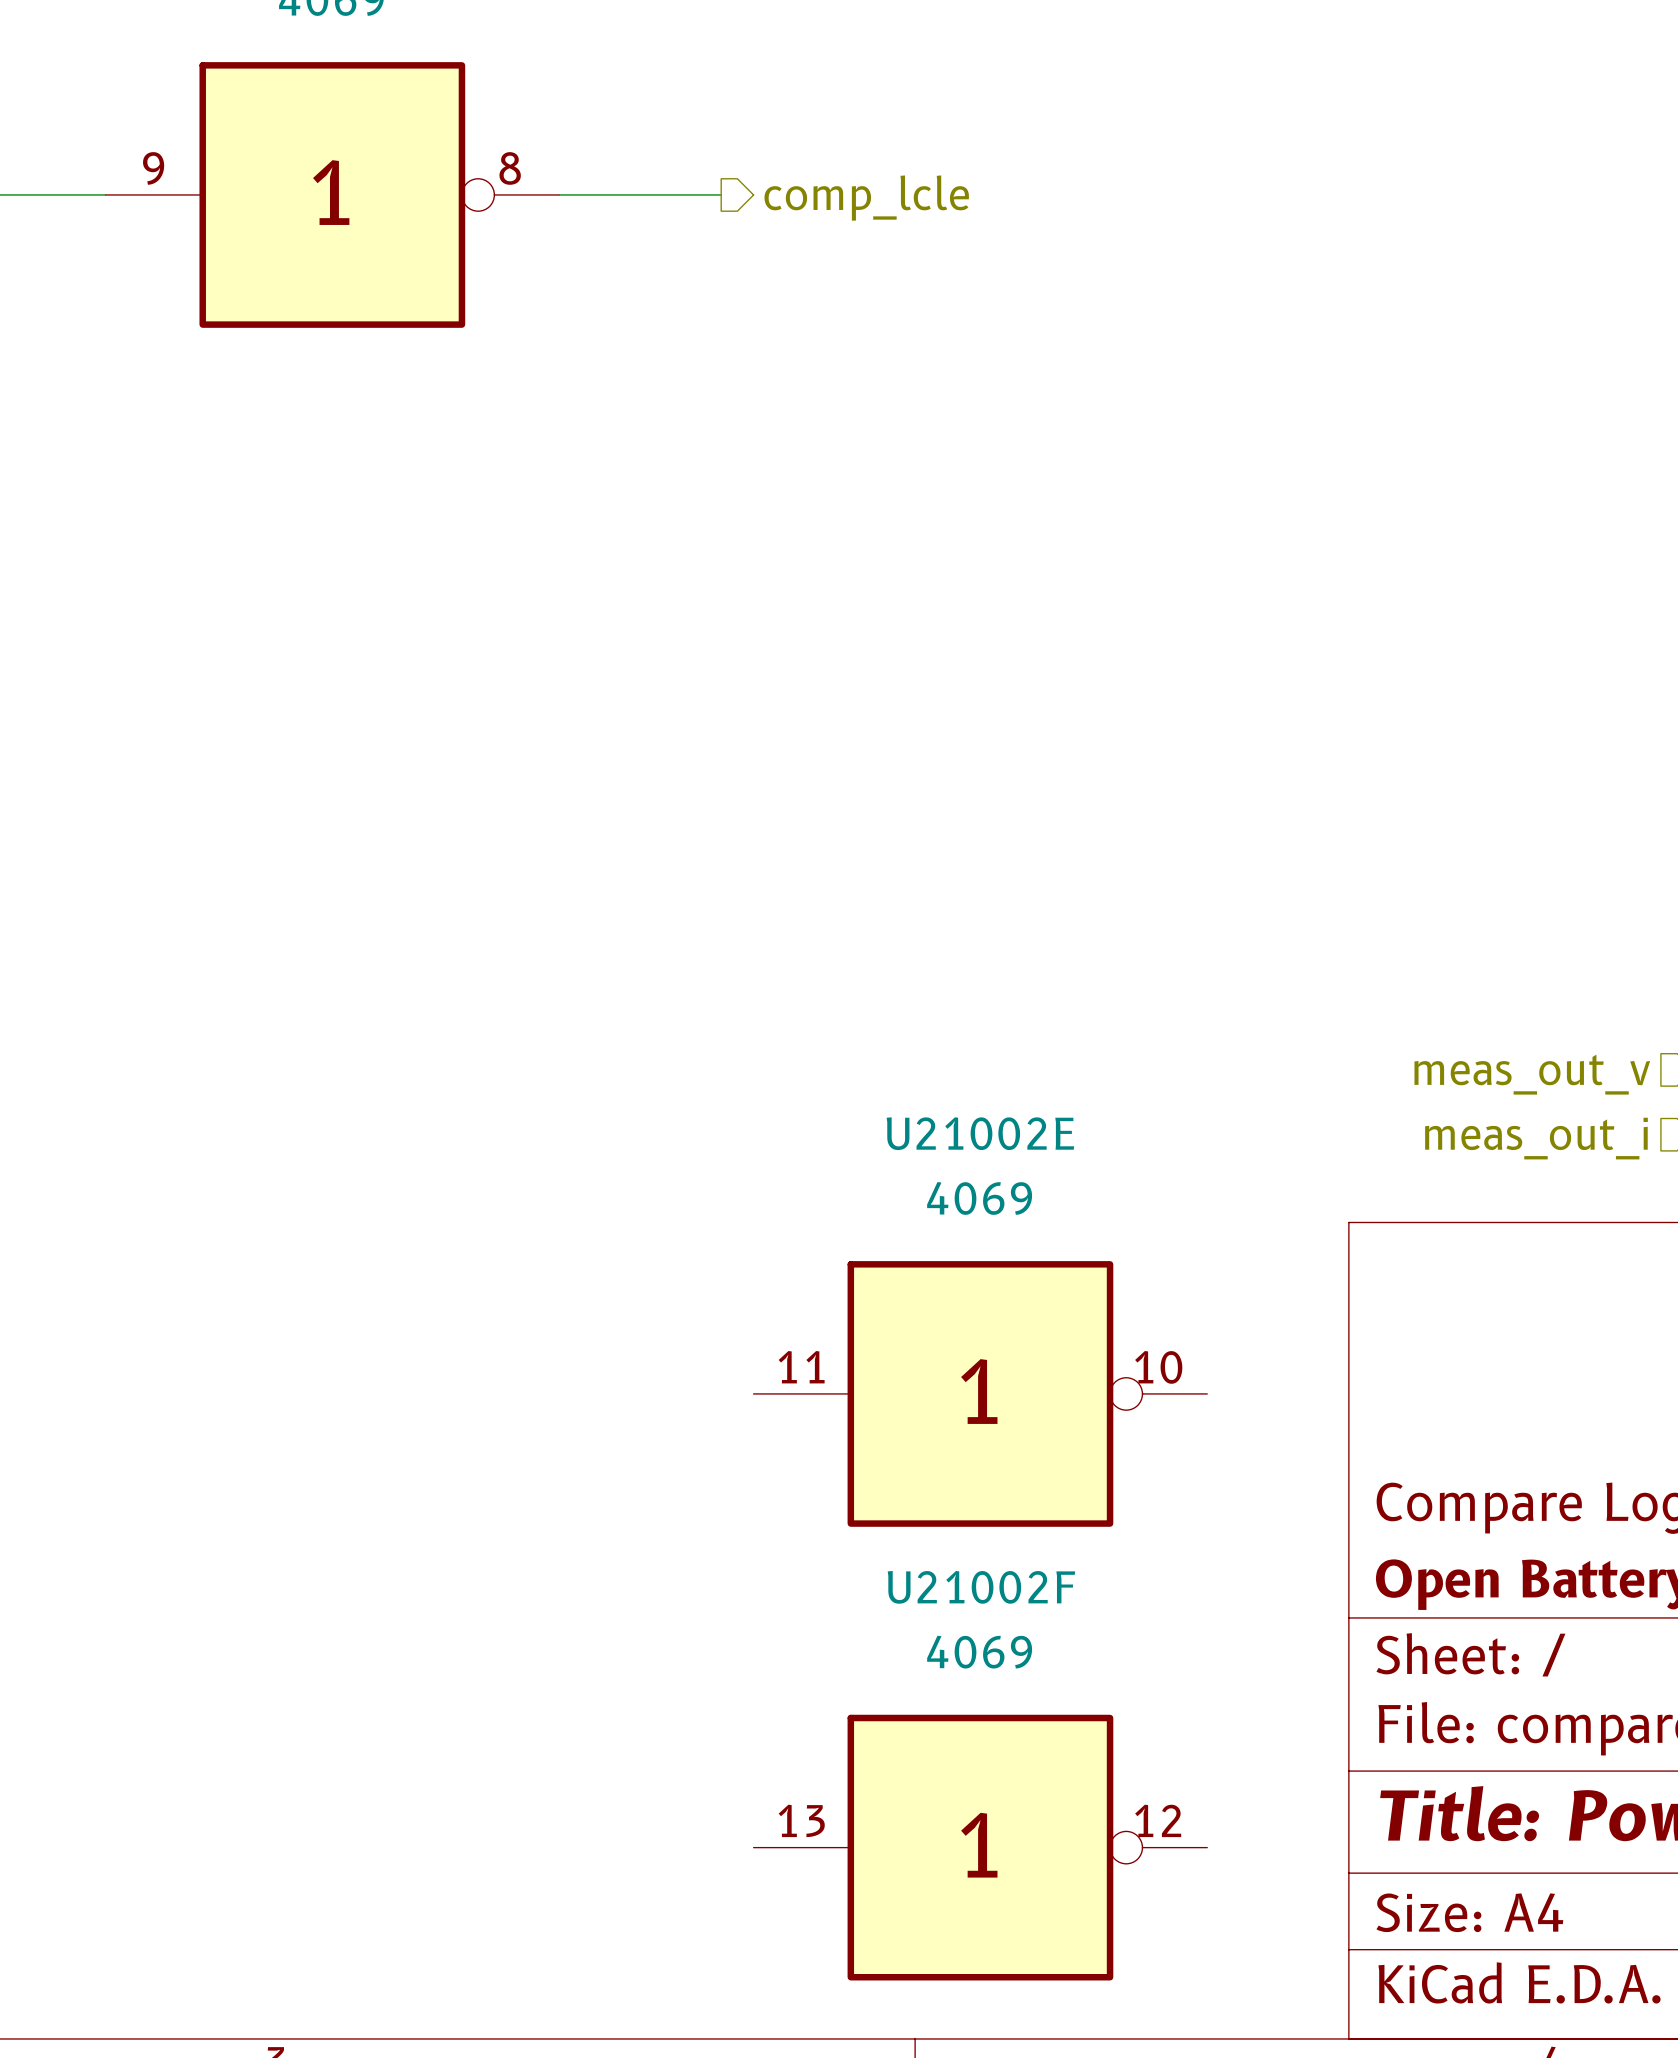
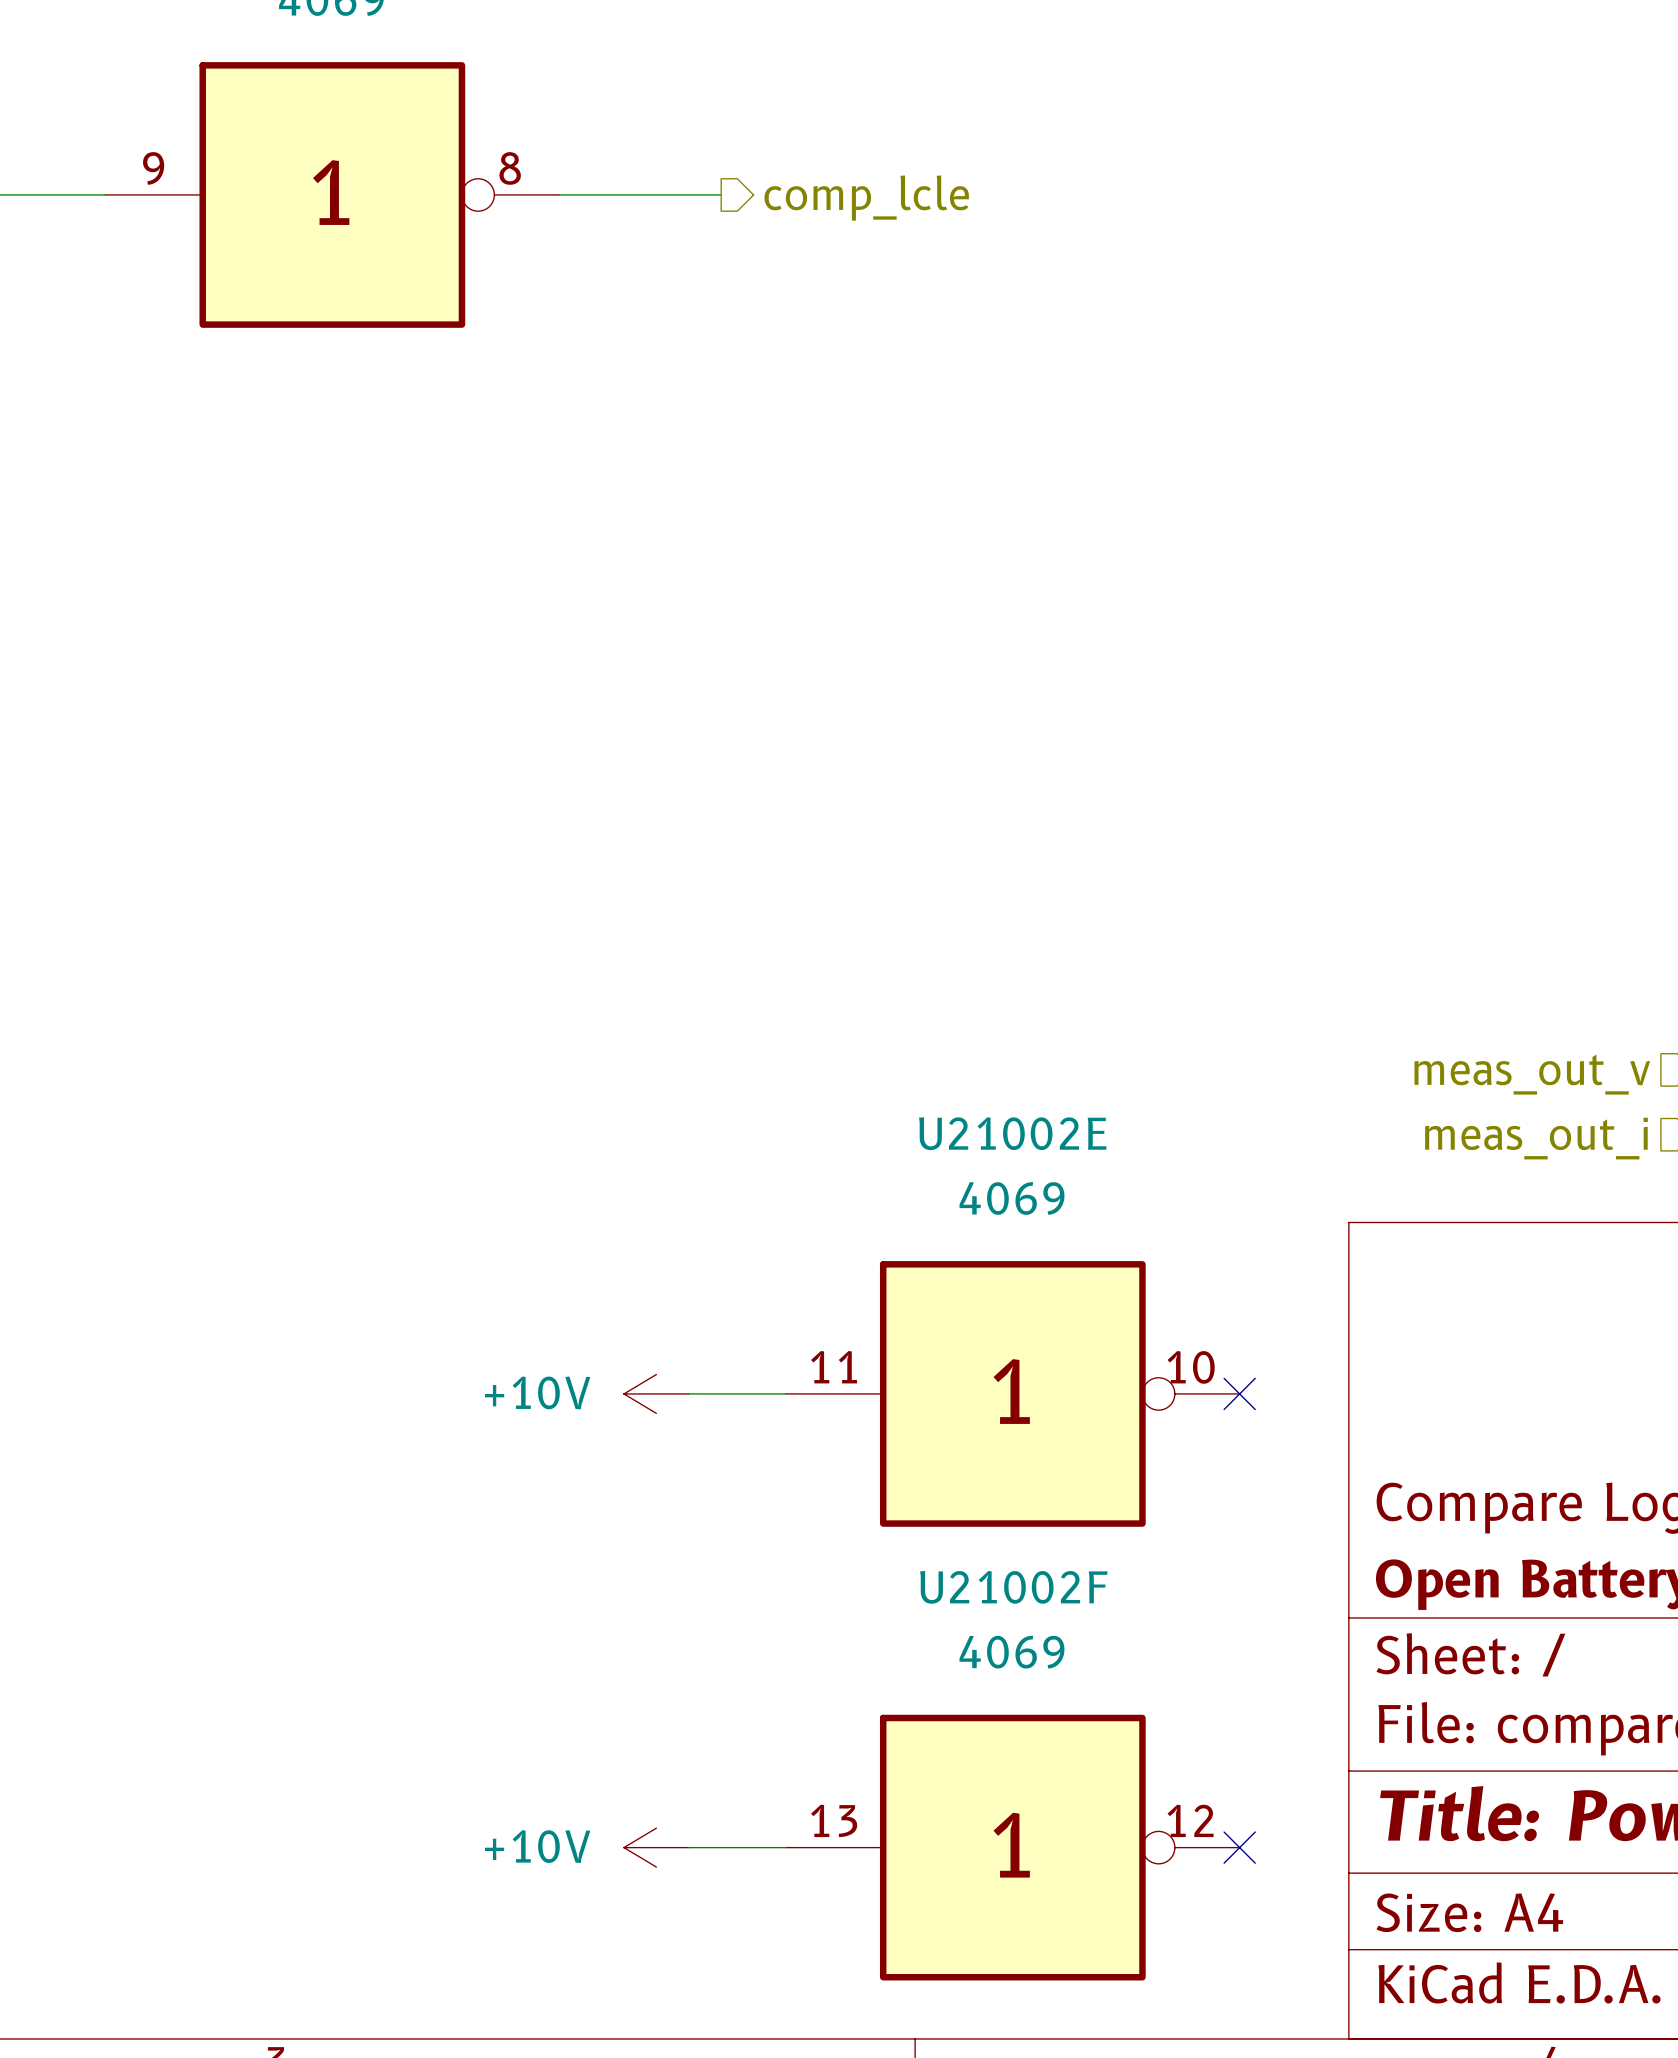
power symbol: none -> +10V (656, 1393)
wire: none -> (688, 1393) (786, 1393)
U21002E position: (980, 1393) -> (1012, 1393)
no-connect mark: none -> (1239, 1393)
power symbol: none -> +10V (656, 1847)
wire: none -> (688, 1847) (786, 1847)
U21002F position: (980, 1847) -> (1012, 1847)
no-connect mark: none -> (1239, 1847)

